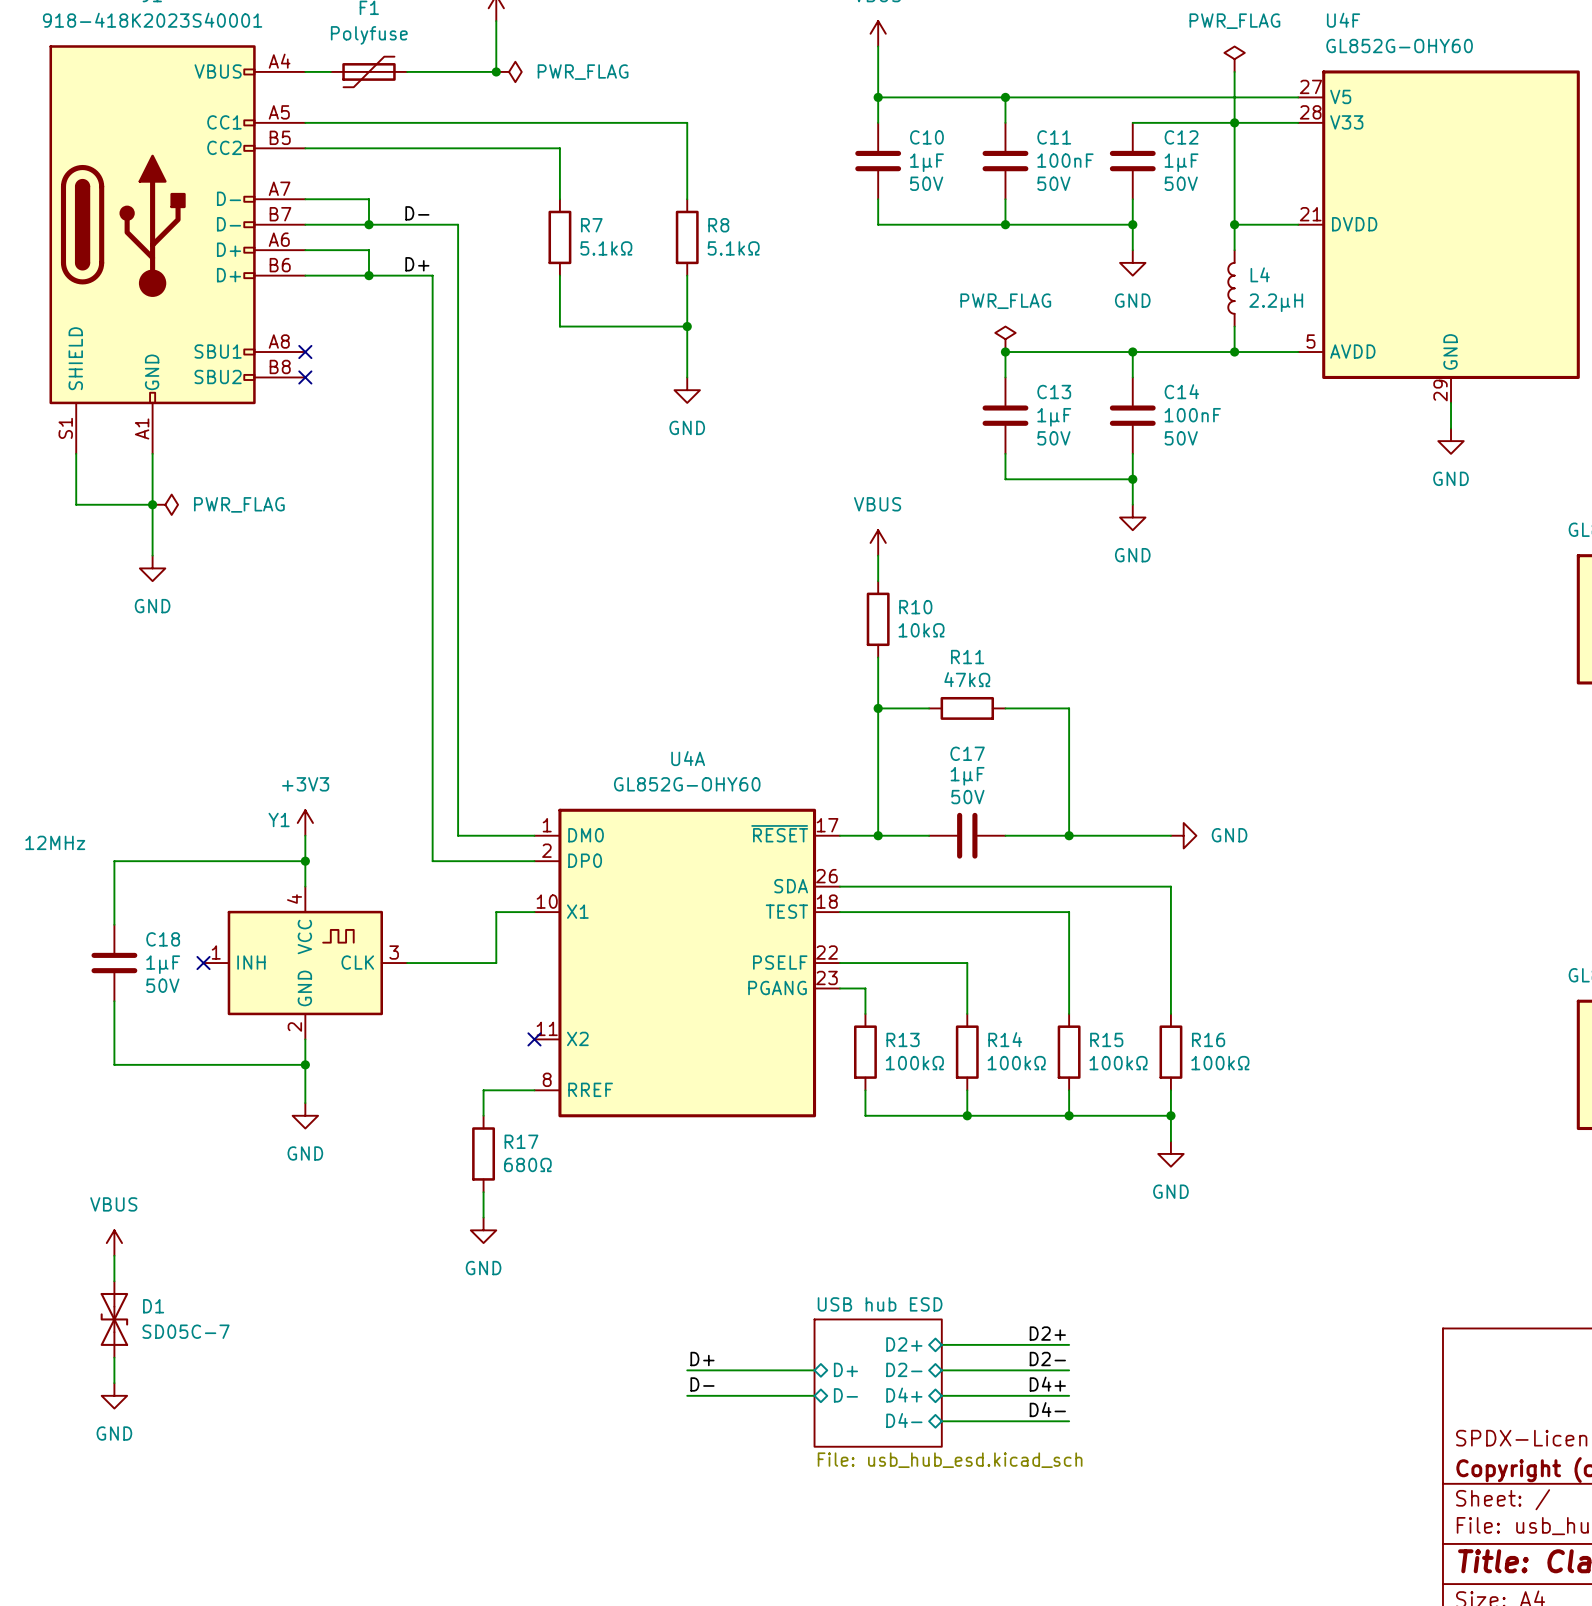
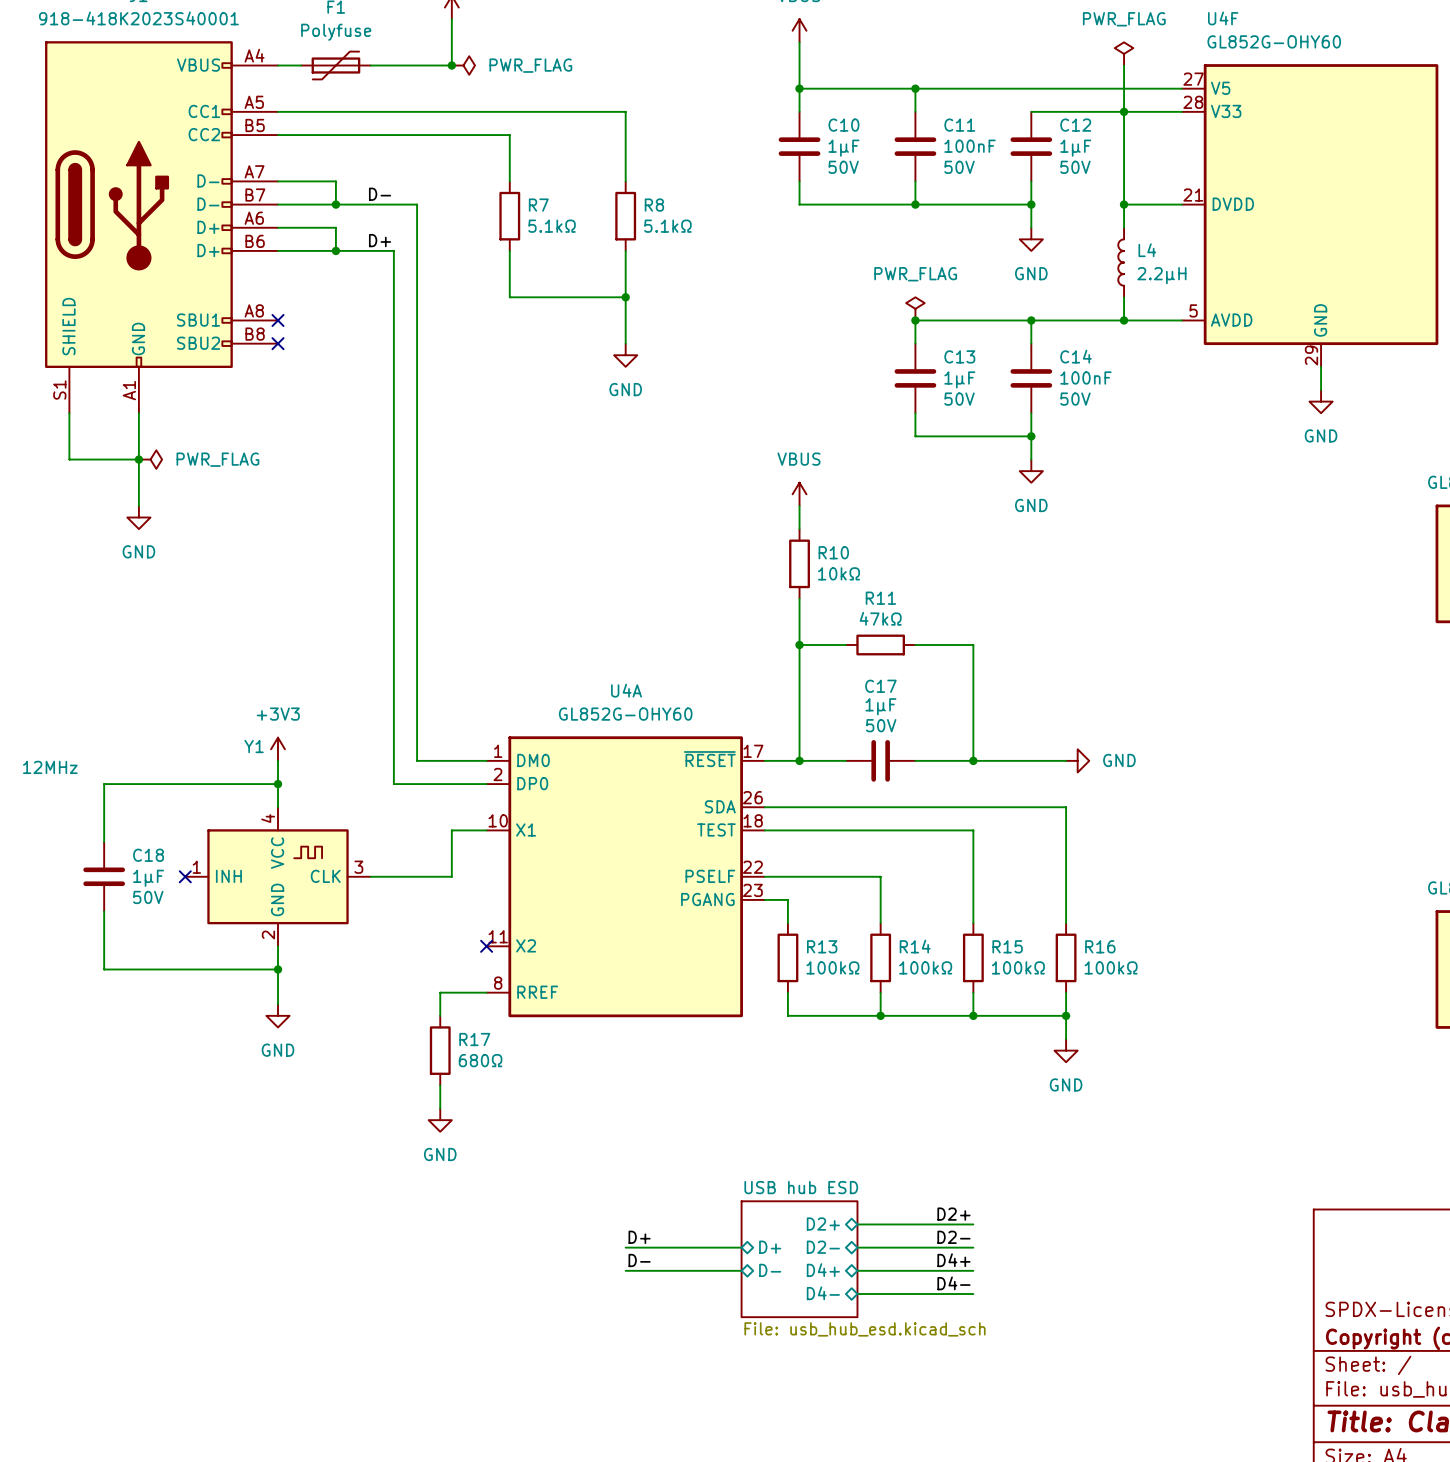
power symbol: VBUS (114, 1243) -> none
wire: (114, 1255) (114, 1281) -> none
D1: SD05C-7 (114, 1319) -> none
wire: (114, 1357) (114, 1383) -> none
power symbol: GND (114, 1395) -> none

